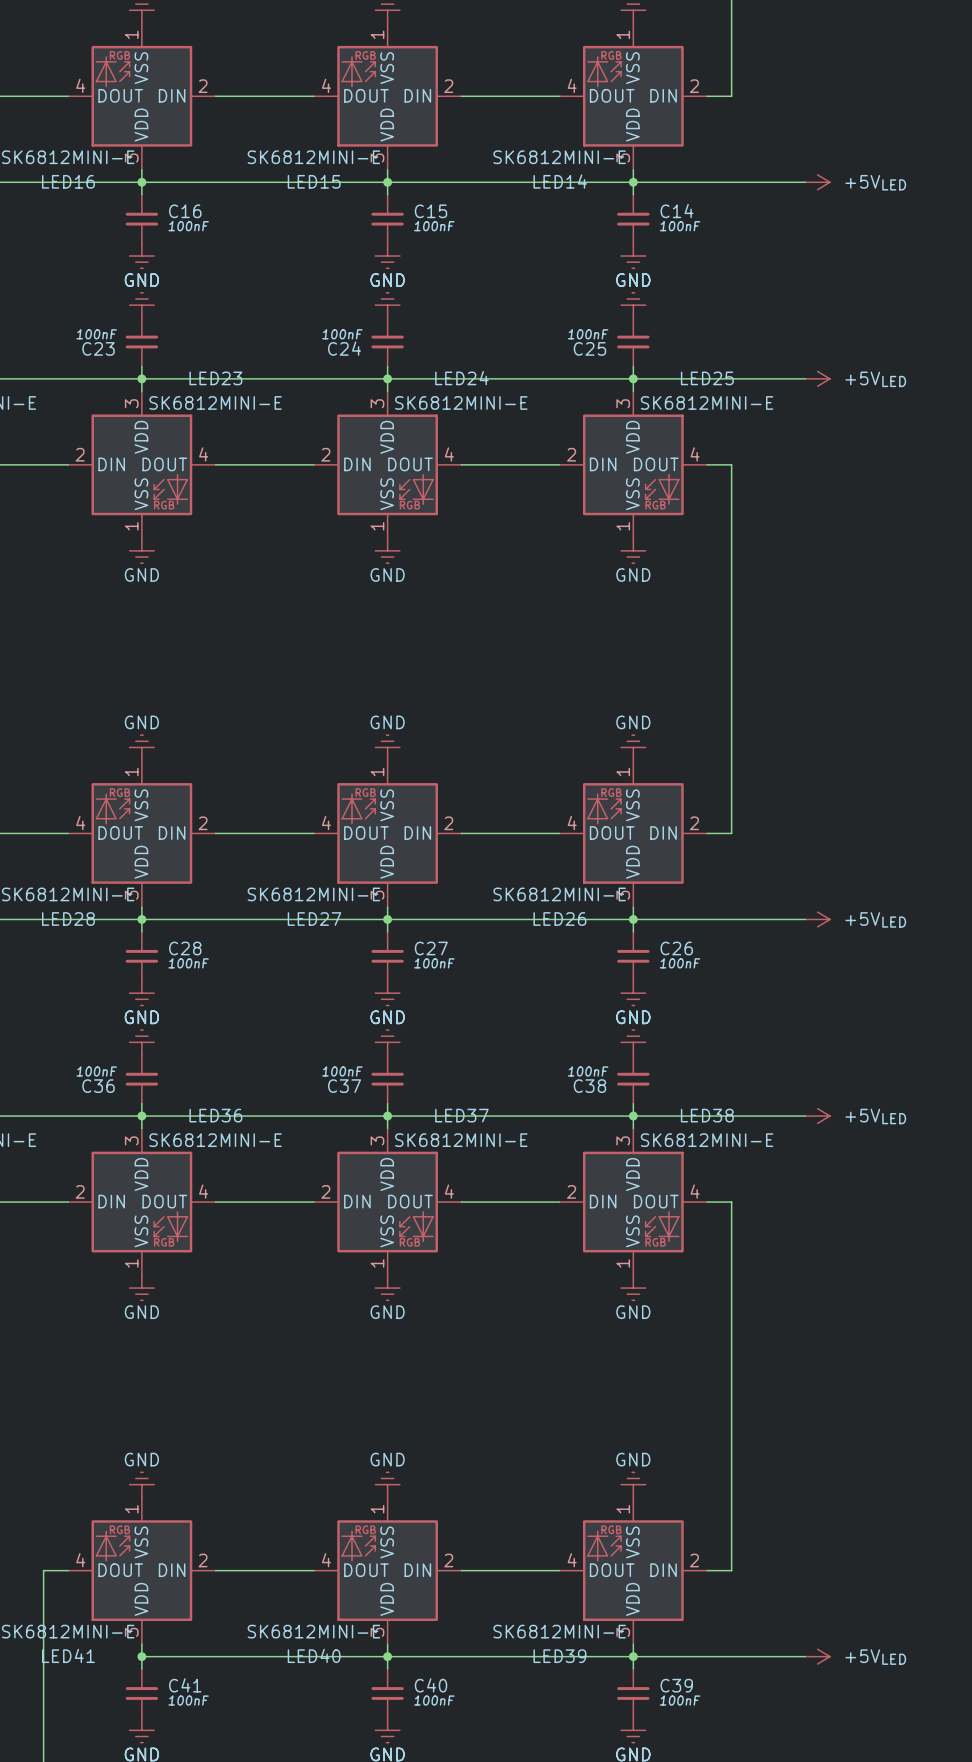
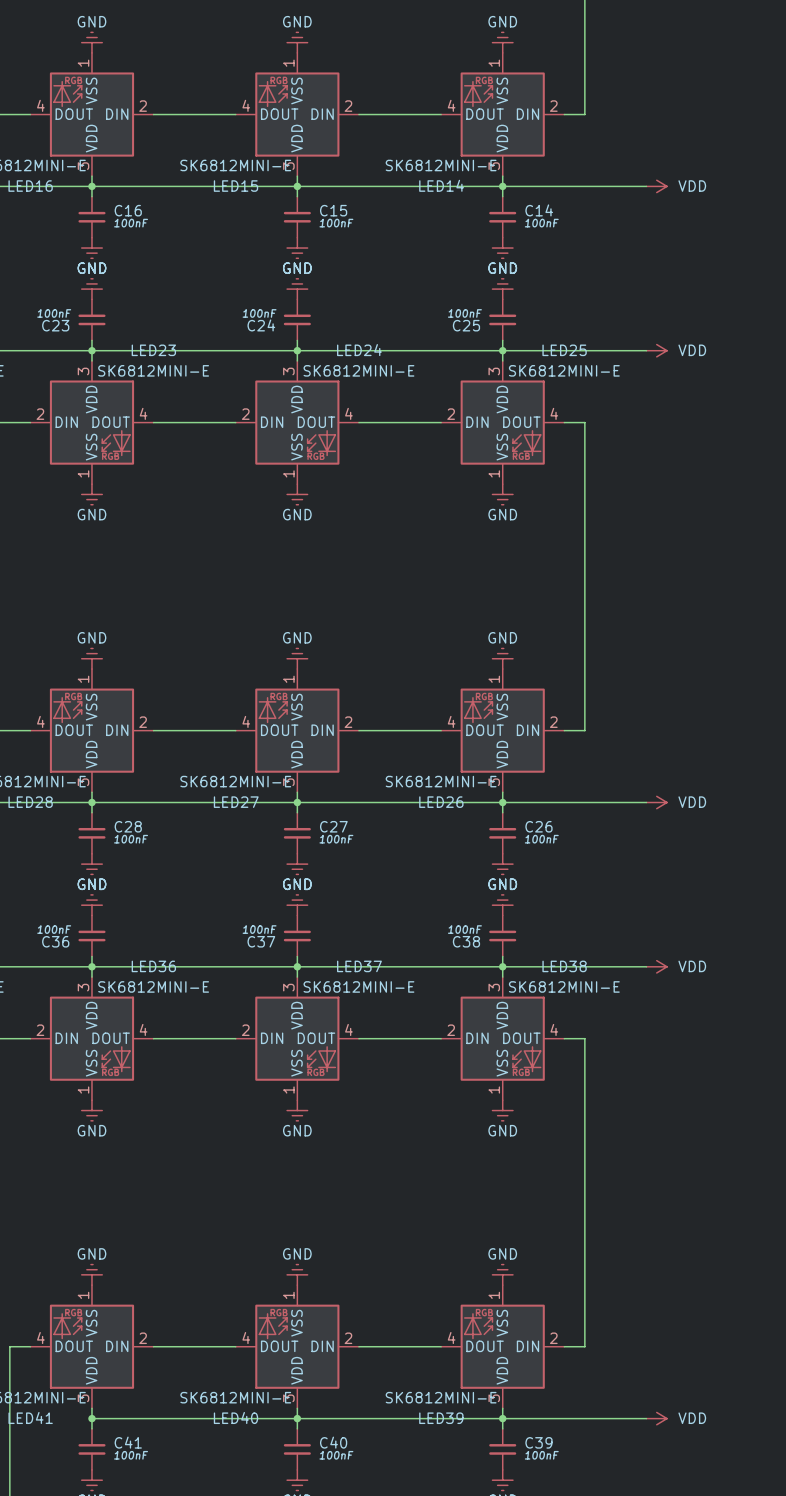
power symbol: +5VLED (817, 182) -> VDD (656, 186)
power symbol: +5VLED (817, 378) -> VDD (656, 350)
power symbol: +5VLED (817, 919) -> VDD (656, 802)
power symbol: +5VLED (817, 1116) -> VDD (656, 966)
power symbol: +5VLED (817, 1656) -> VDD (656, 1418)

